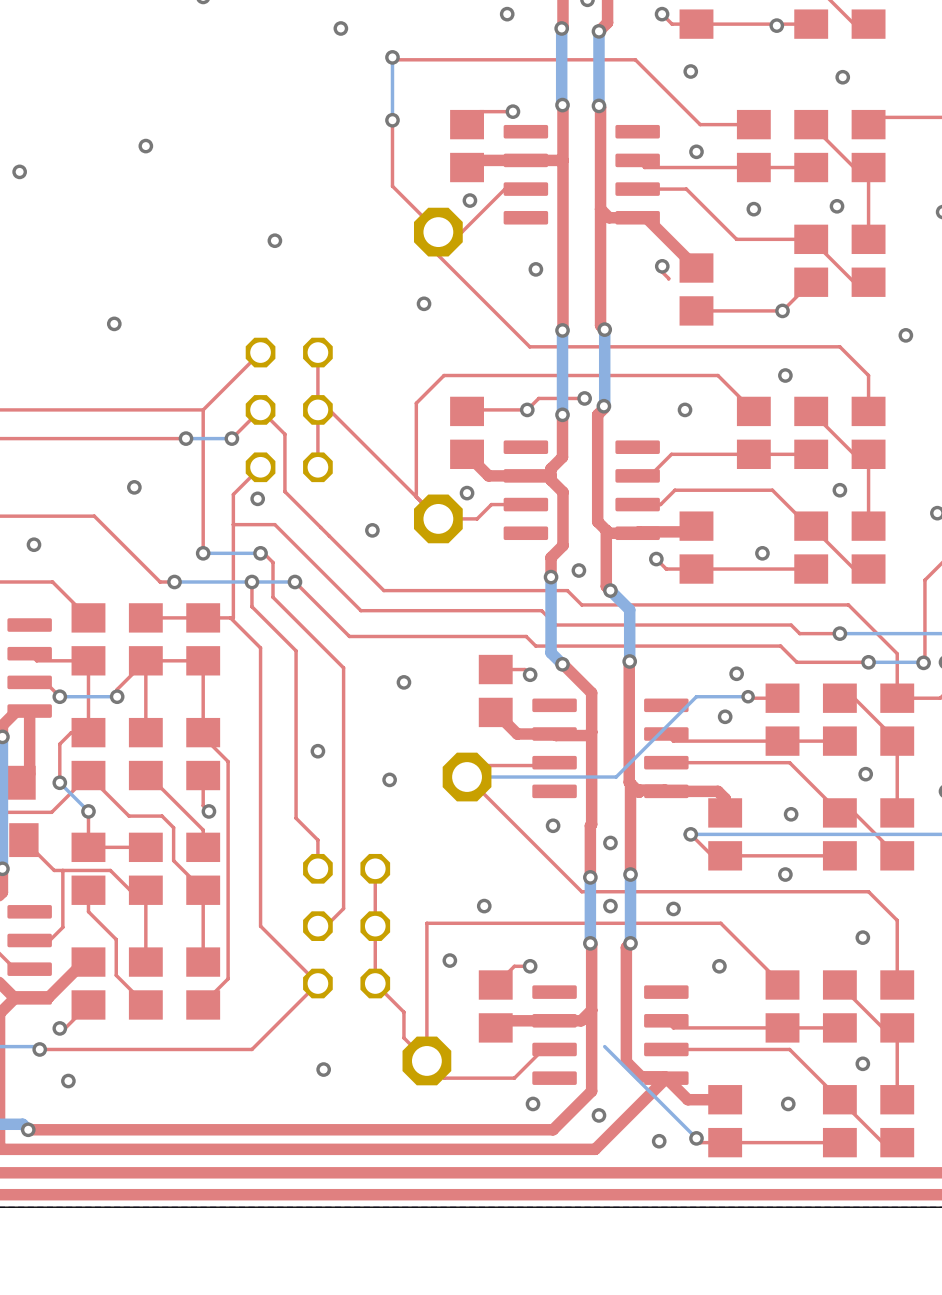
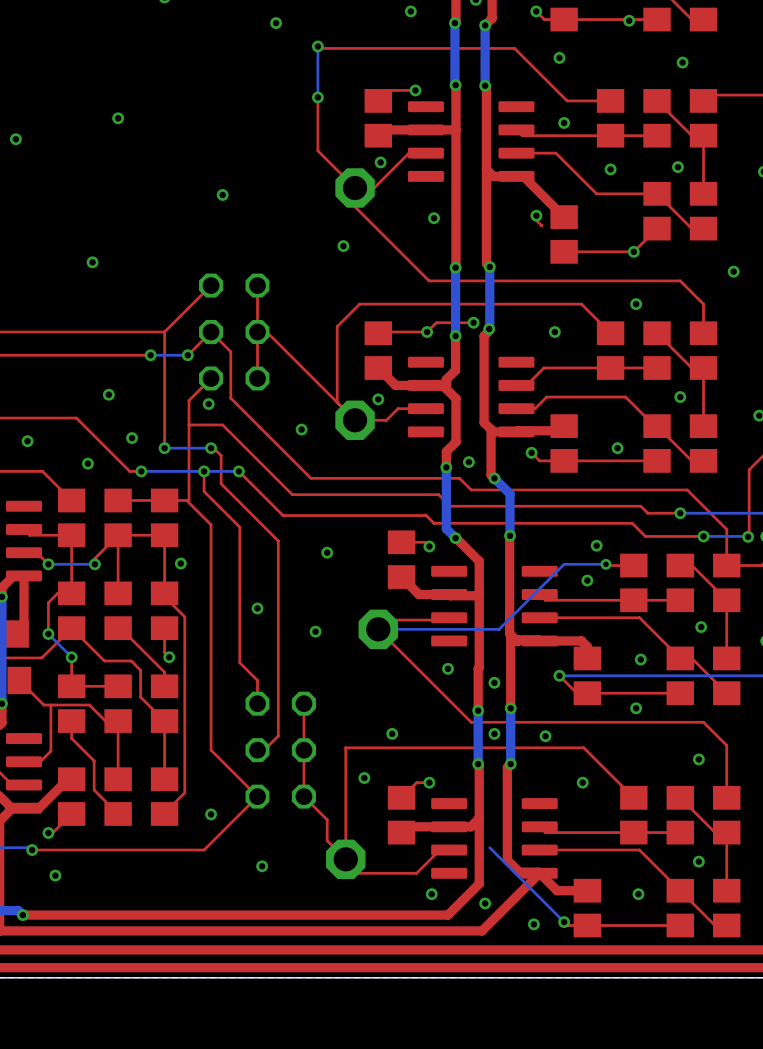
via: none -> (132, 438)
via: none -> (87, 463)
via: none -> (180, 563)
via: none -> (211, 814)

